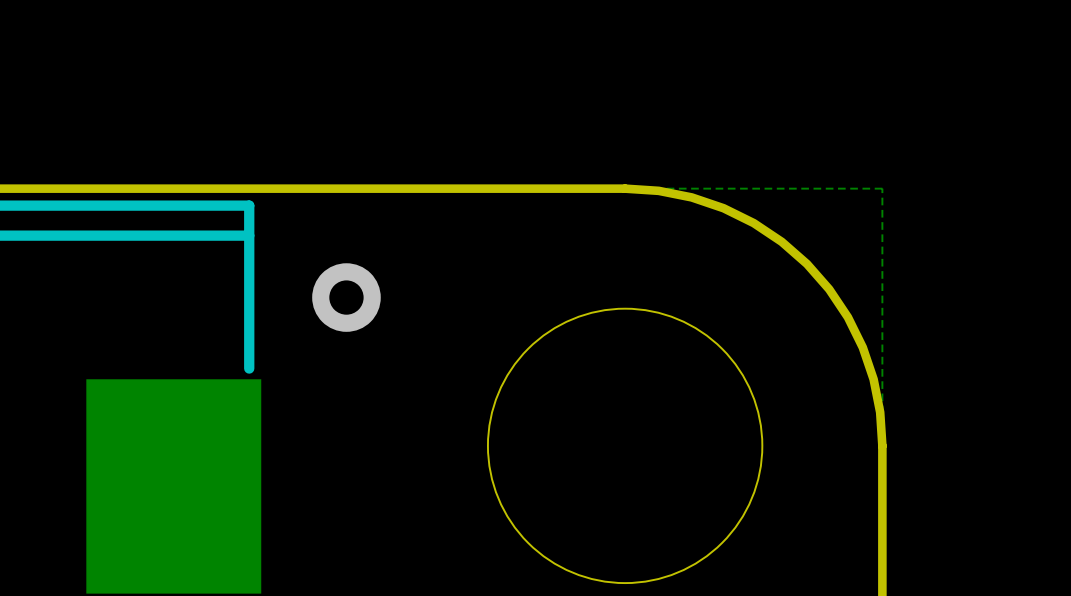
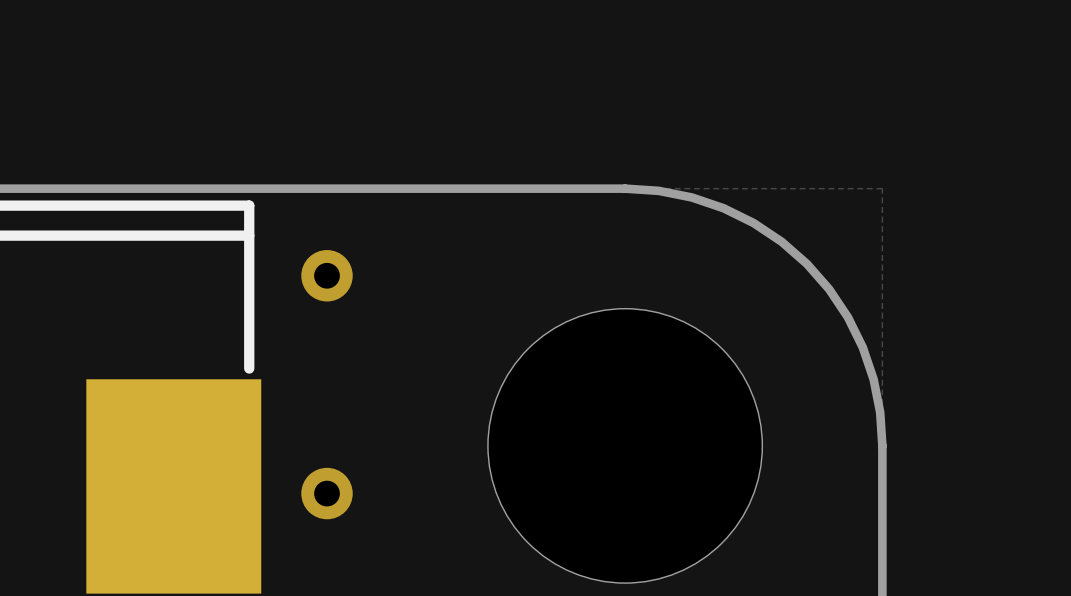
via size: [312, 263, 381, 332] -> [301, 250, 353, 302]
via: none -> (327, 493)

